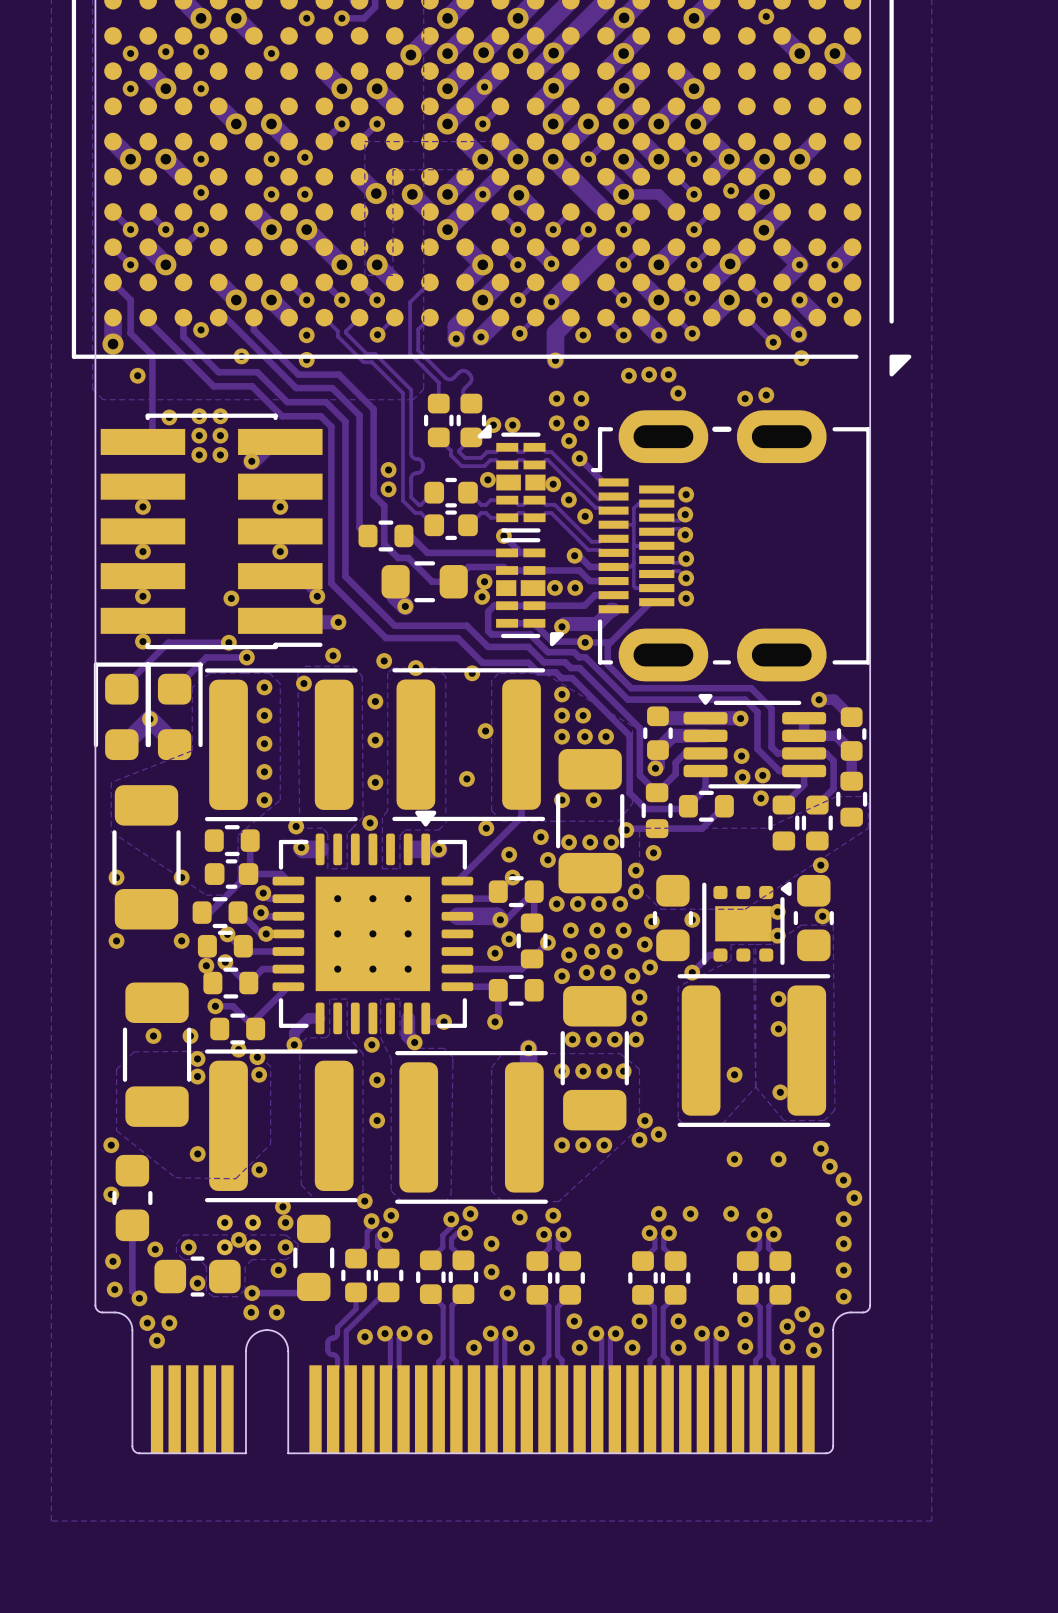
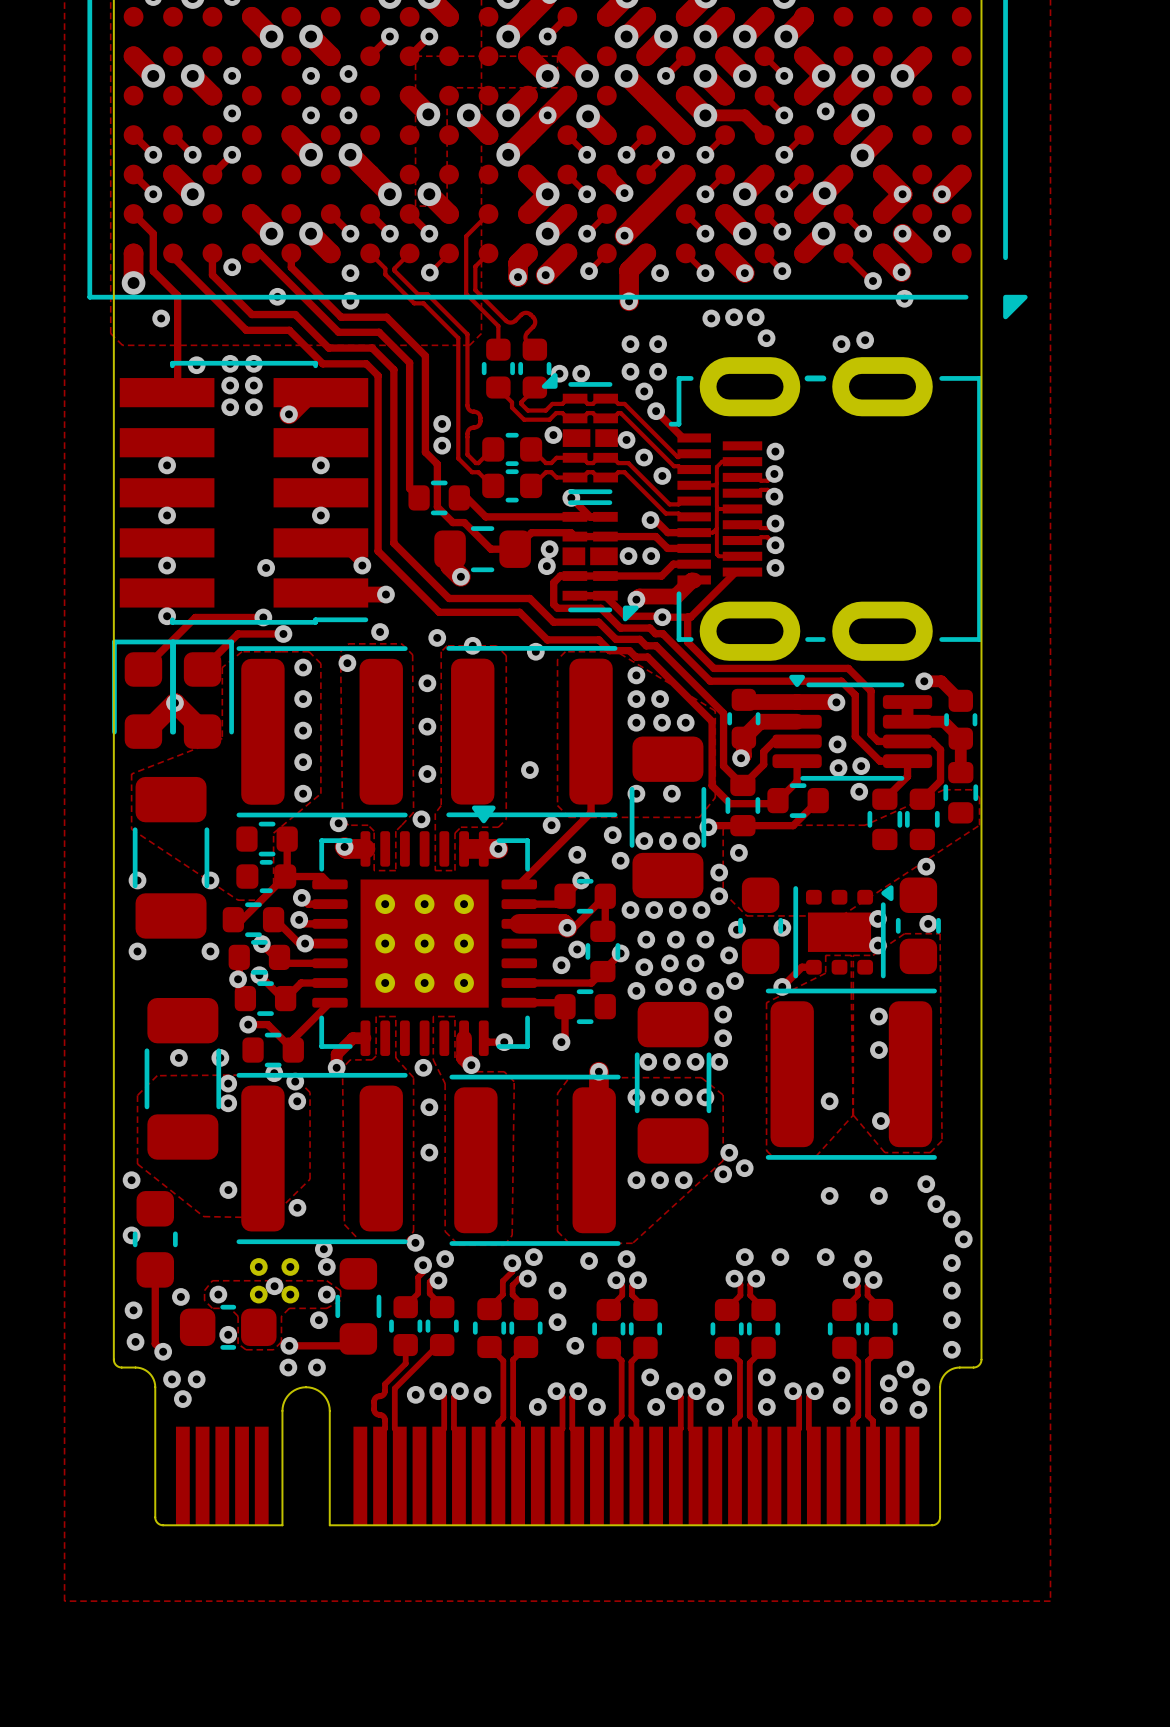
via: (485, 731) -> none

